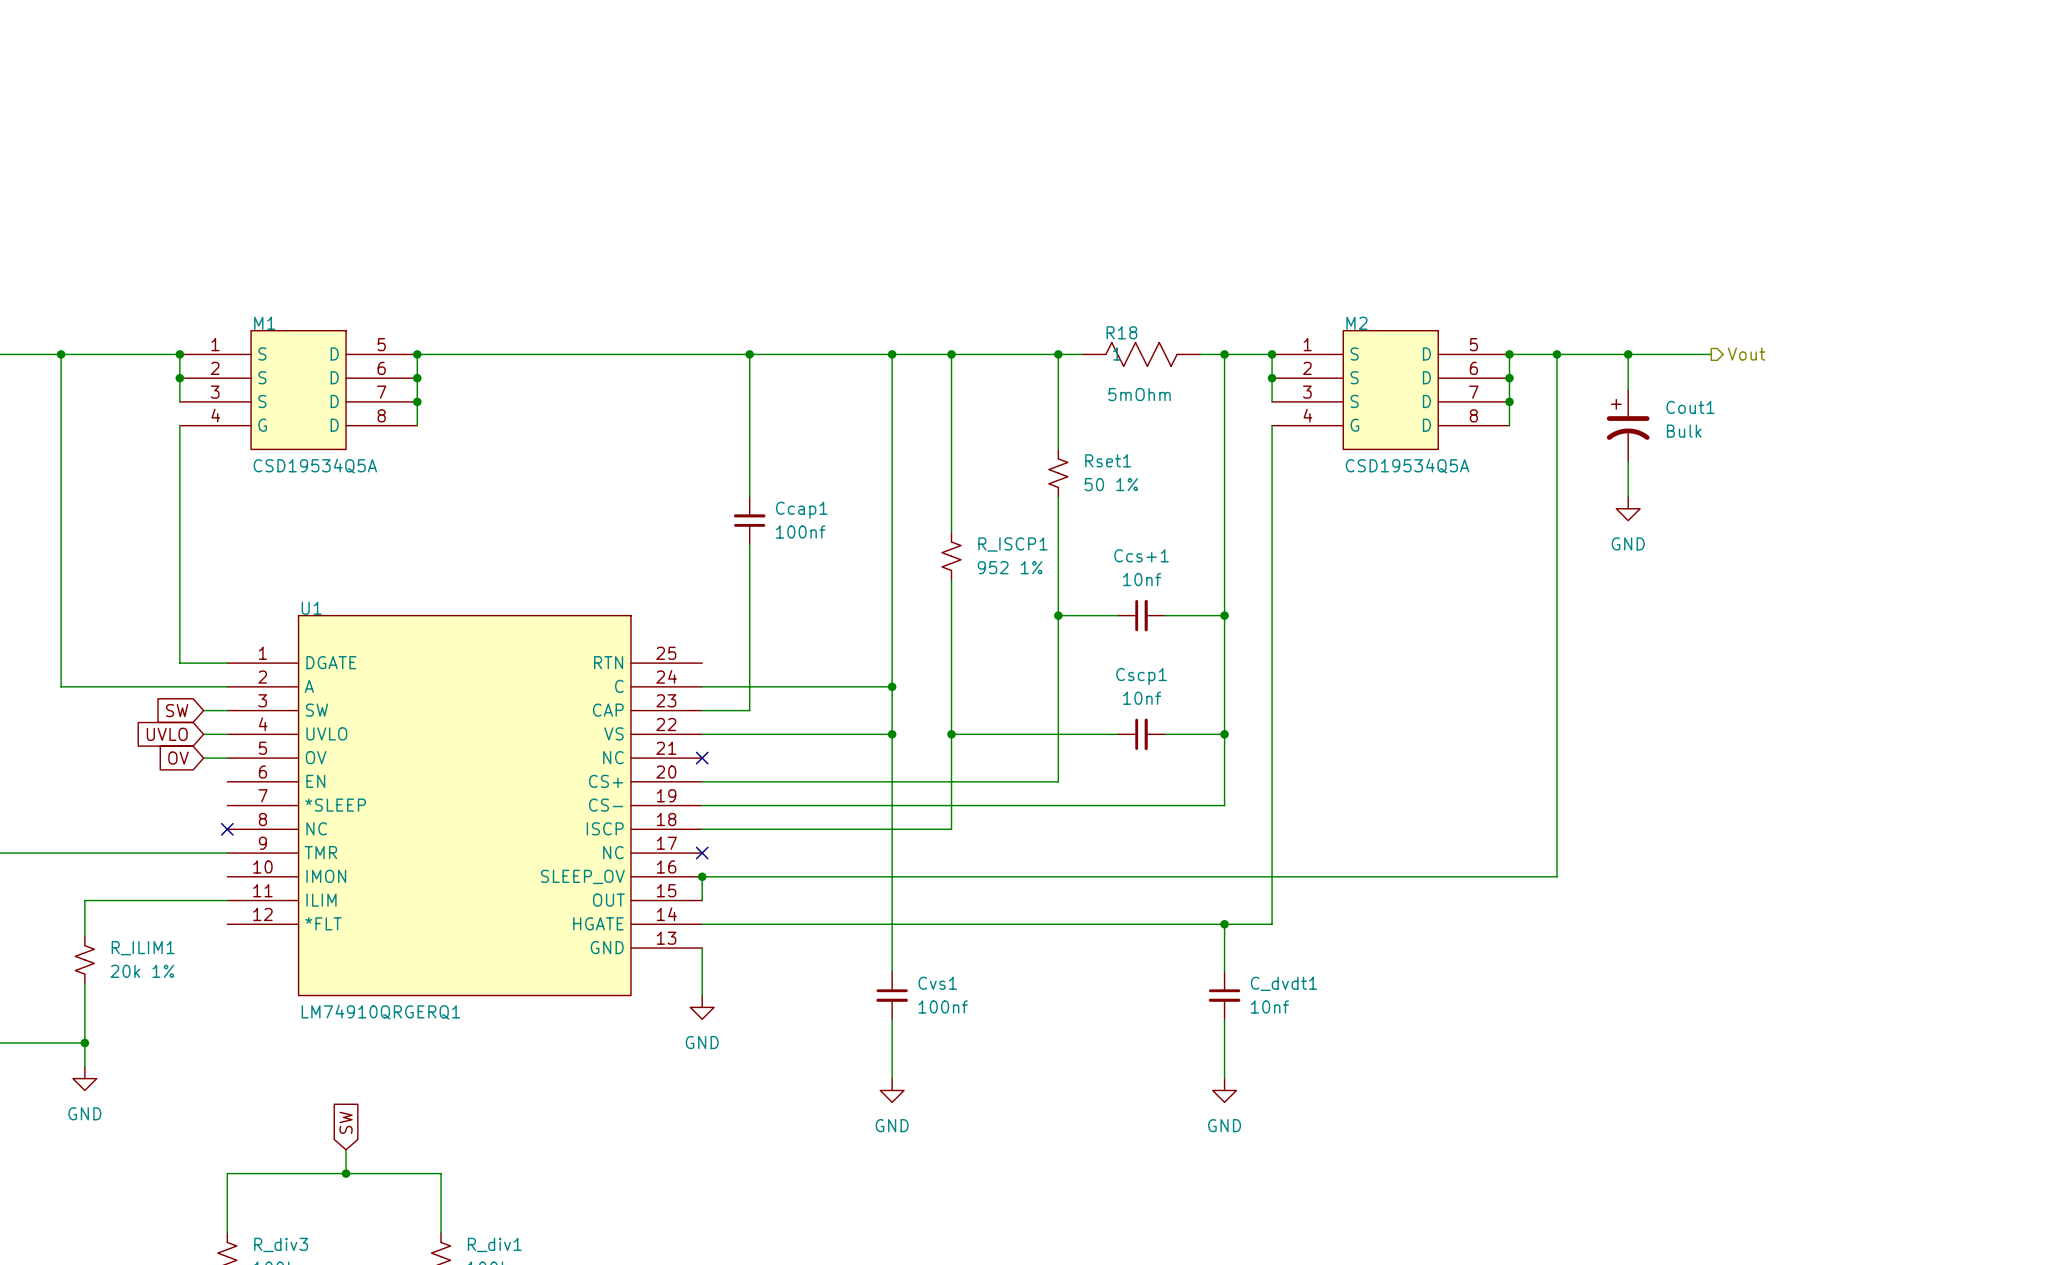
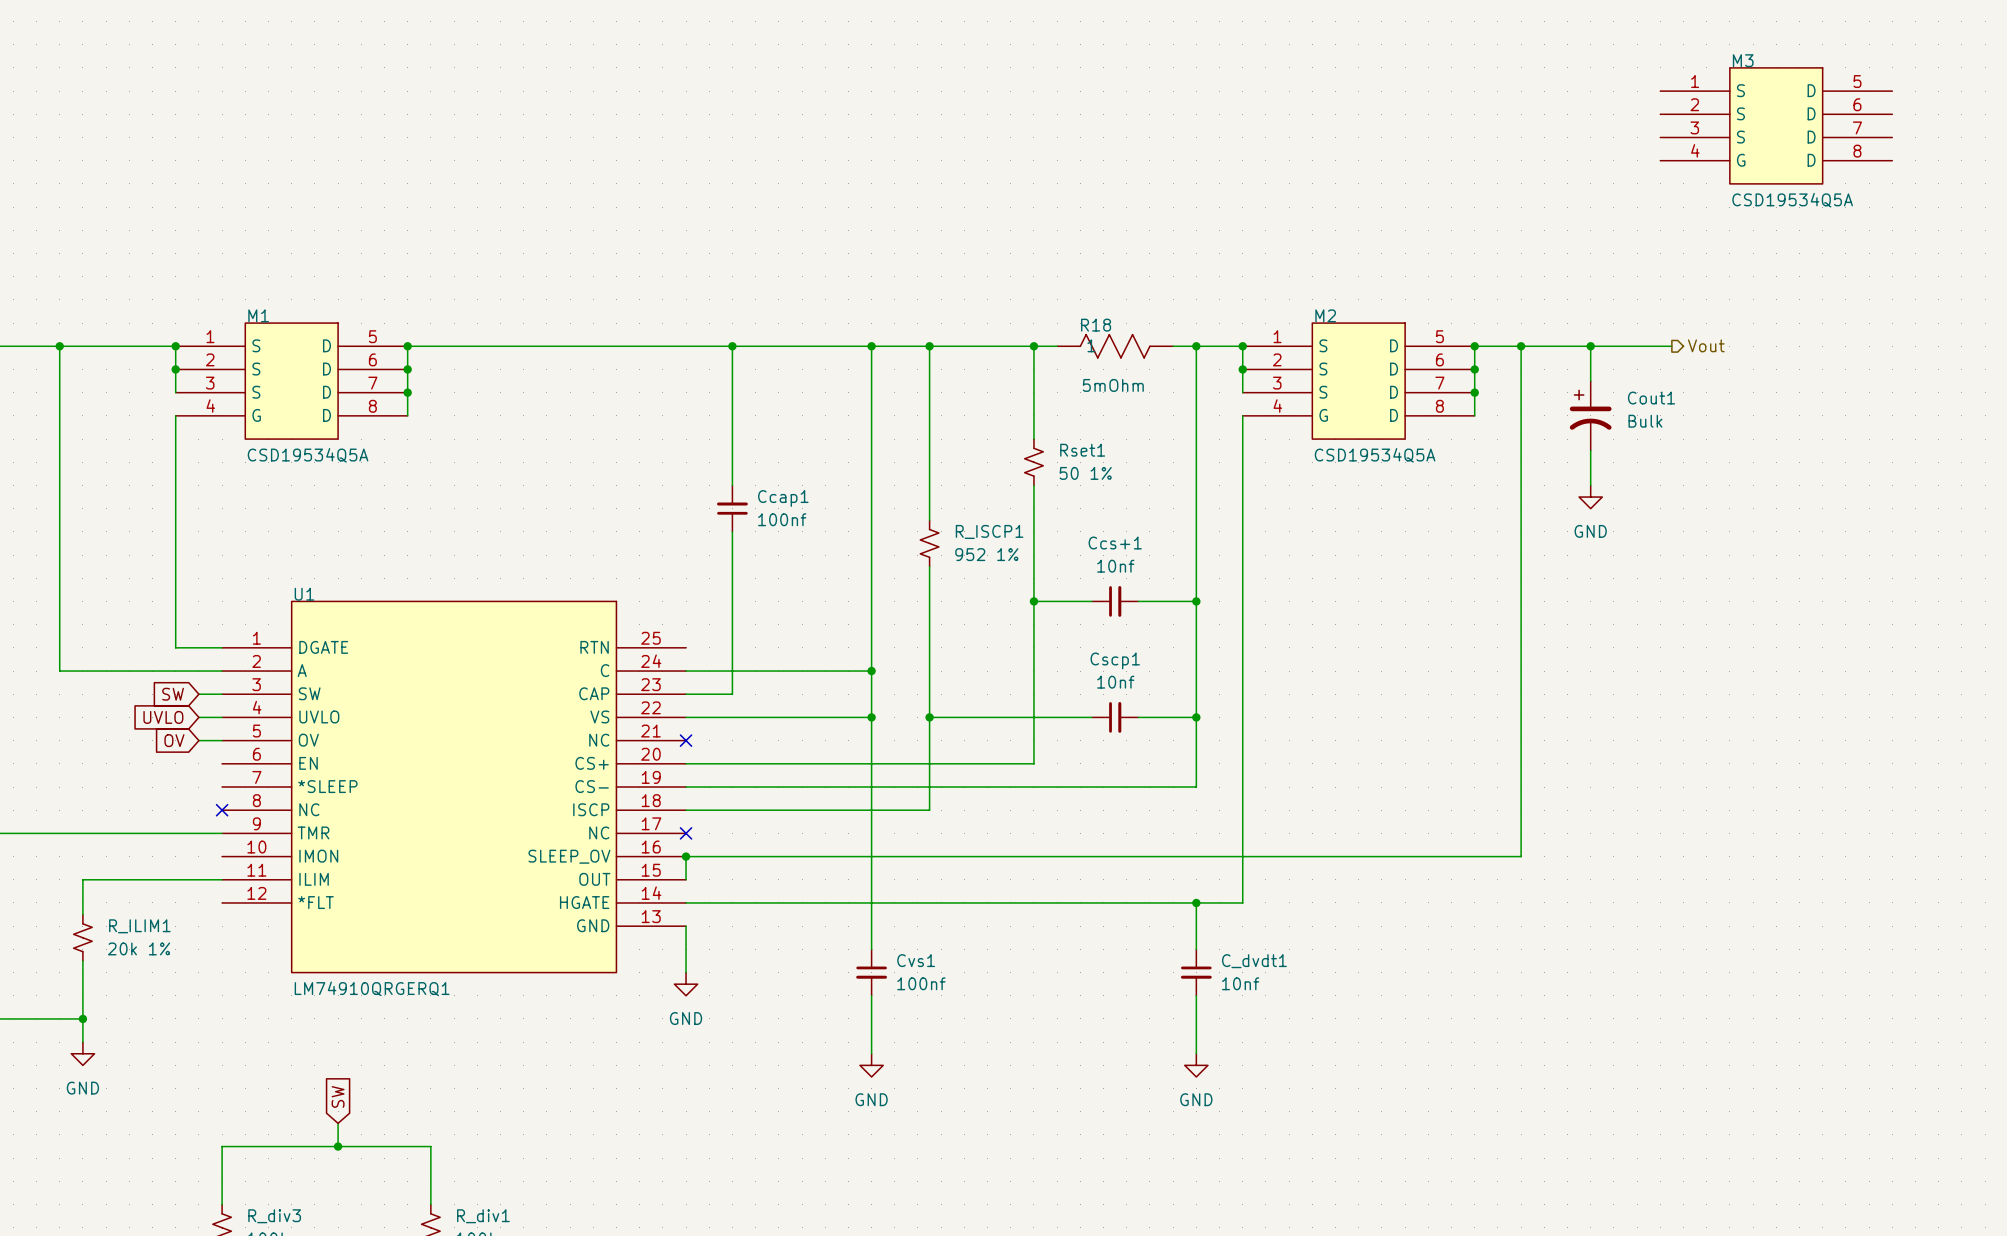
M3: none -> CSD19534Q5A (1776, 125)

